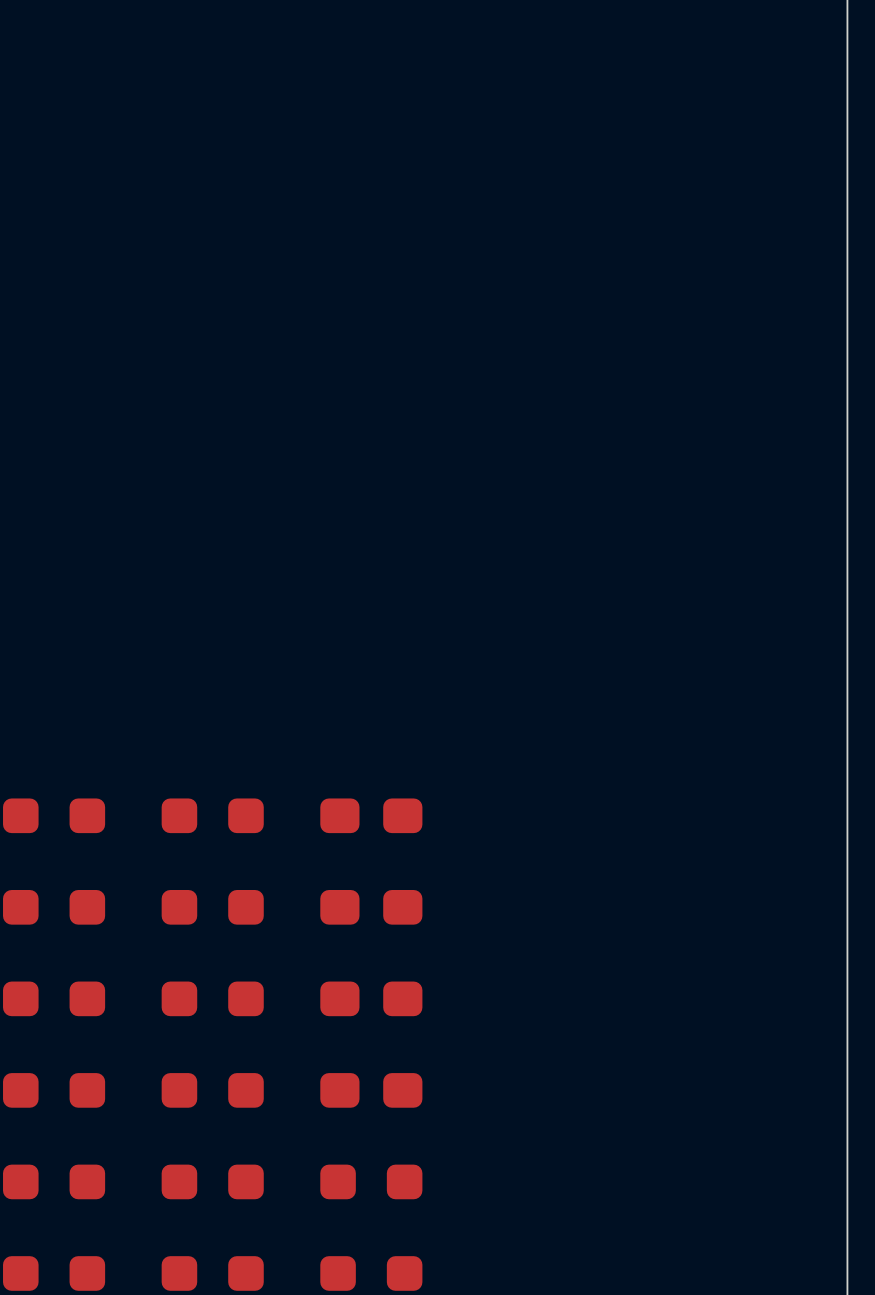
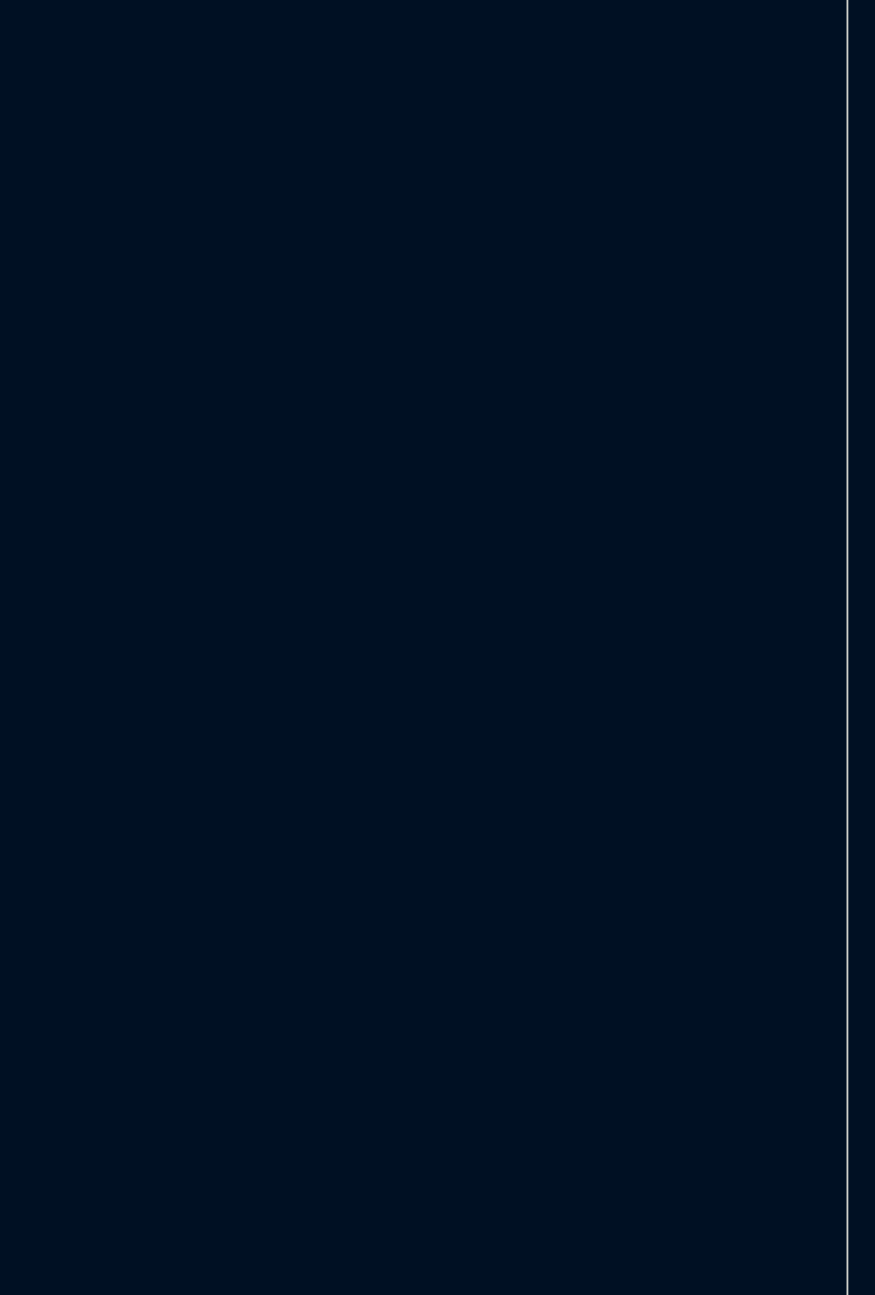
part: (54, 815) -> none
part: (212, 815) -> none
part: (371, 815) -> none
part: (54, 907) -> none
part: (212, 907) -> none
part: (371, 907) -> none
part: (54, 998) -> none
part: (212, 998) -> none
part: (371, 998) -> none
part: (54, 1090) -> none
part: (212, 1090) -> none
part: (371, 1090) -> none
part: (54, 1181) -> none
part: (212, 1181) -> none
part: (371, 1181) -> none
part: (54, 1273) -> none
part: (212, 1273) -> none
part: (371, 1273) -> none

